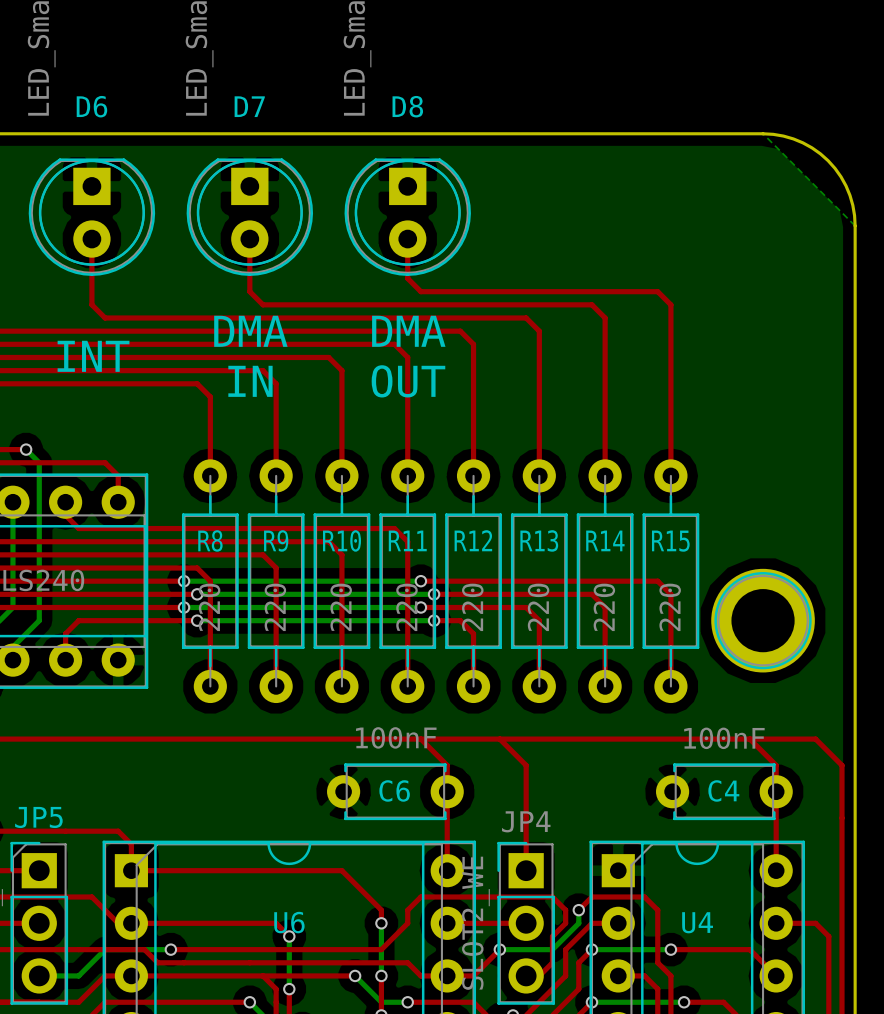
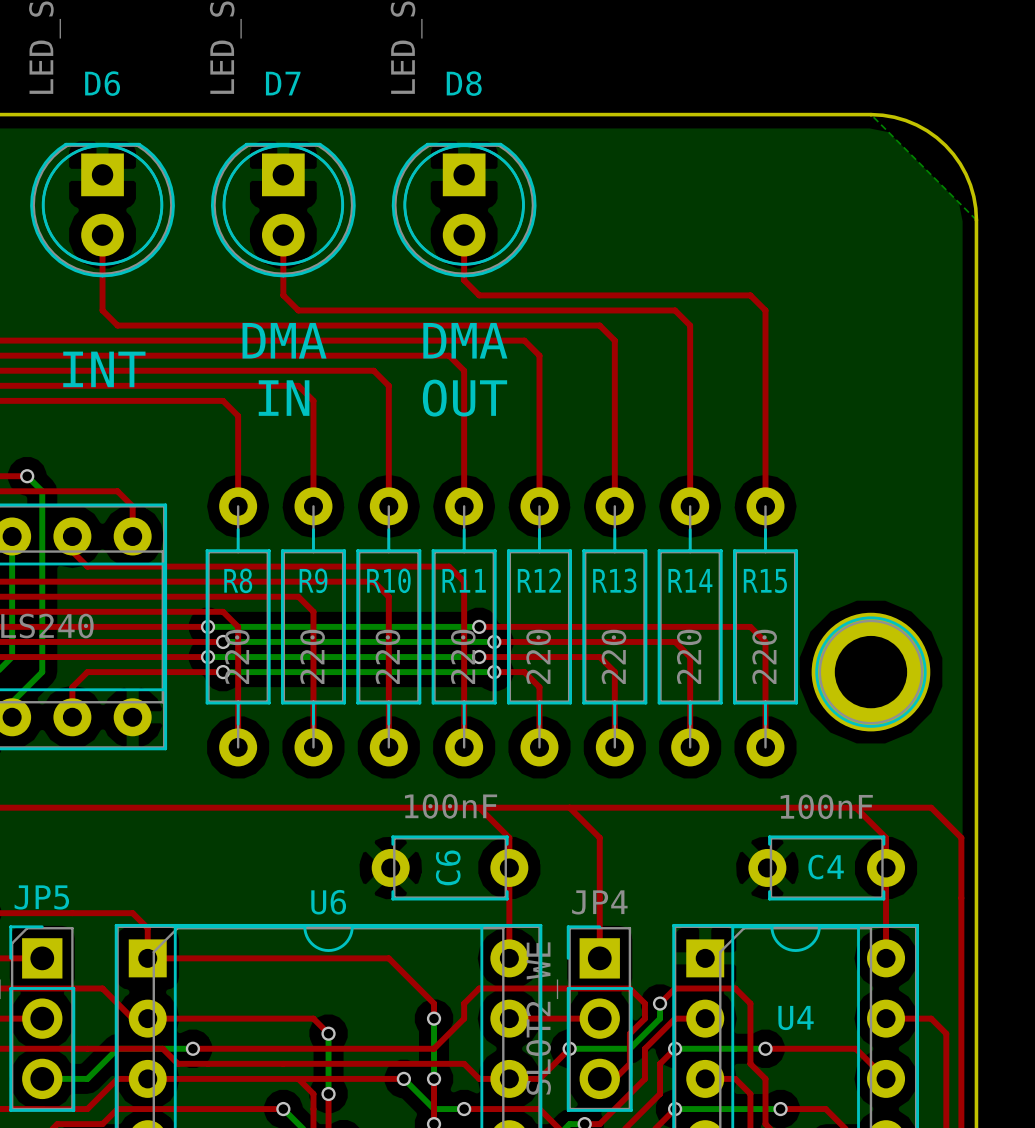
C6 name rotation: 0° (394, 790) -> 90° counterclockwise (448, 867)
U6 name position: U6 (289, 922) -> U6 (328, 902)

